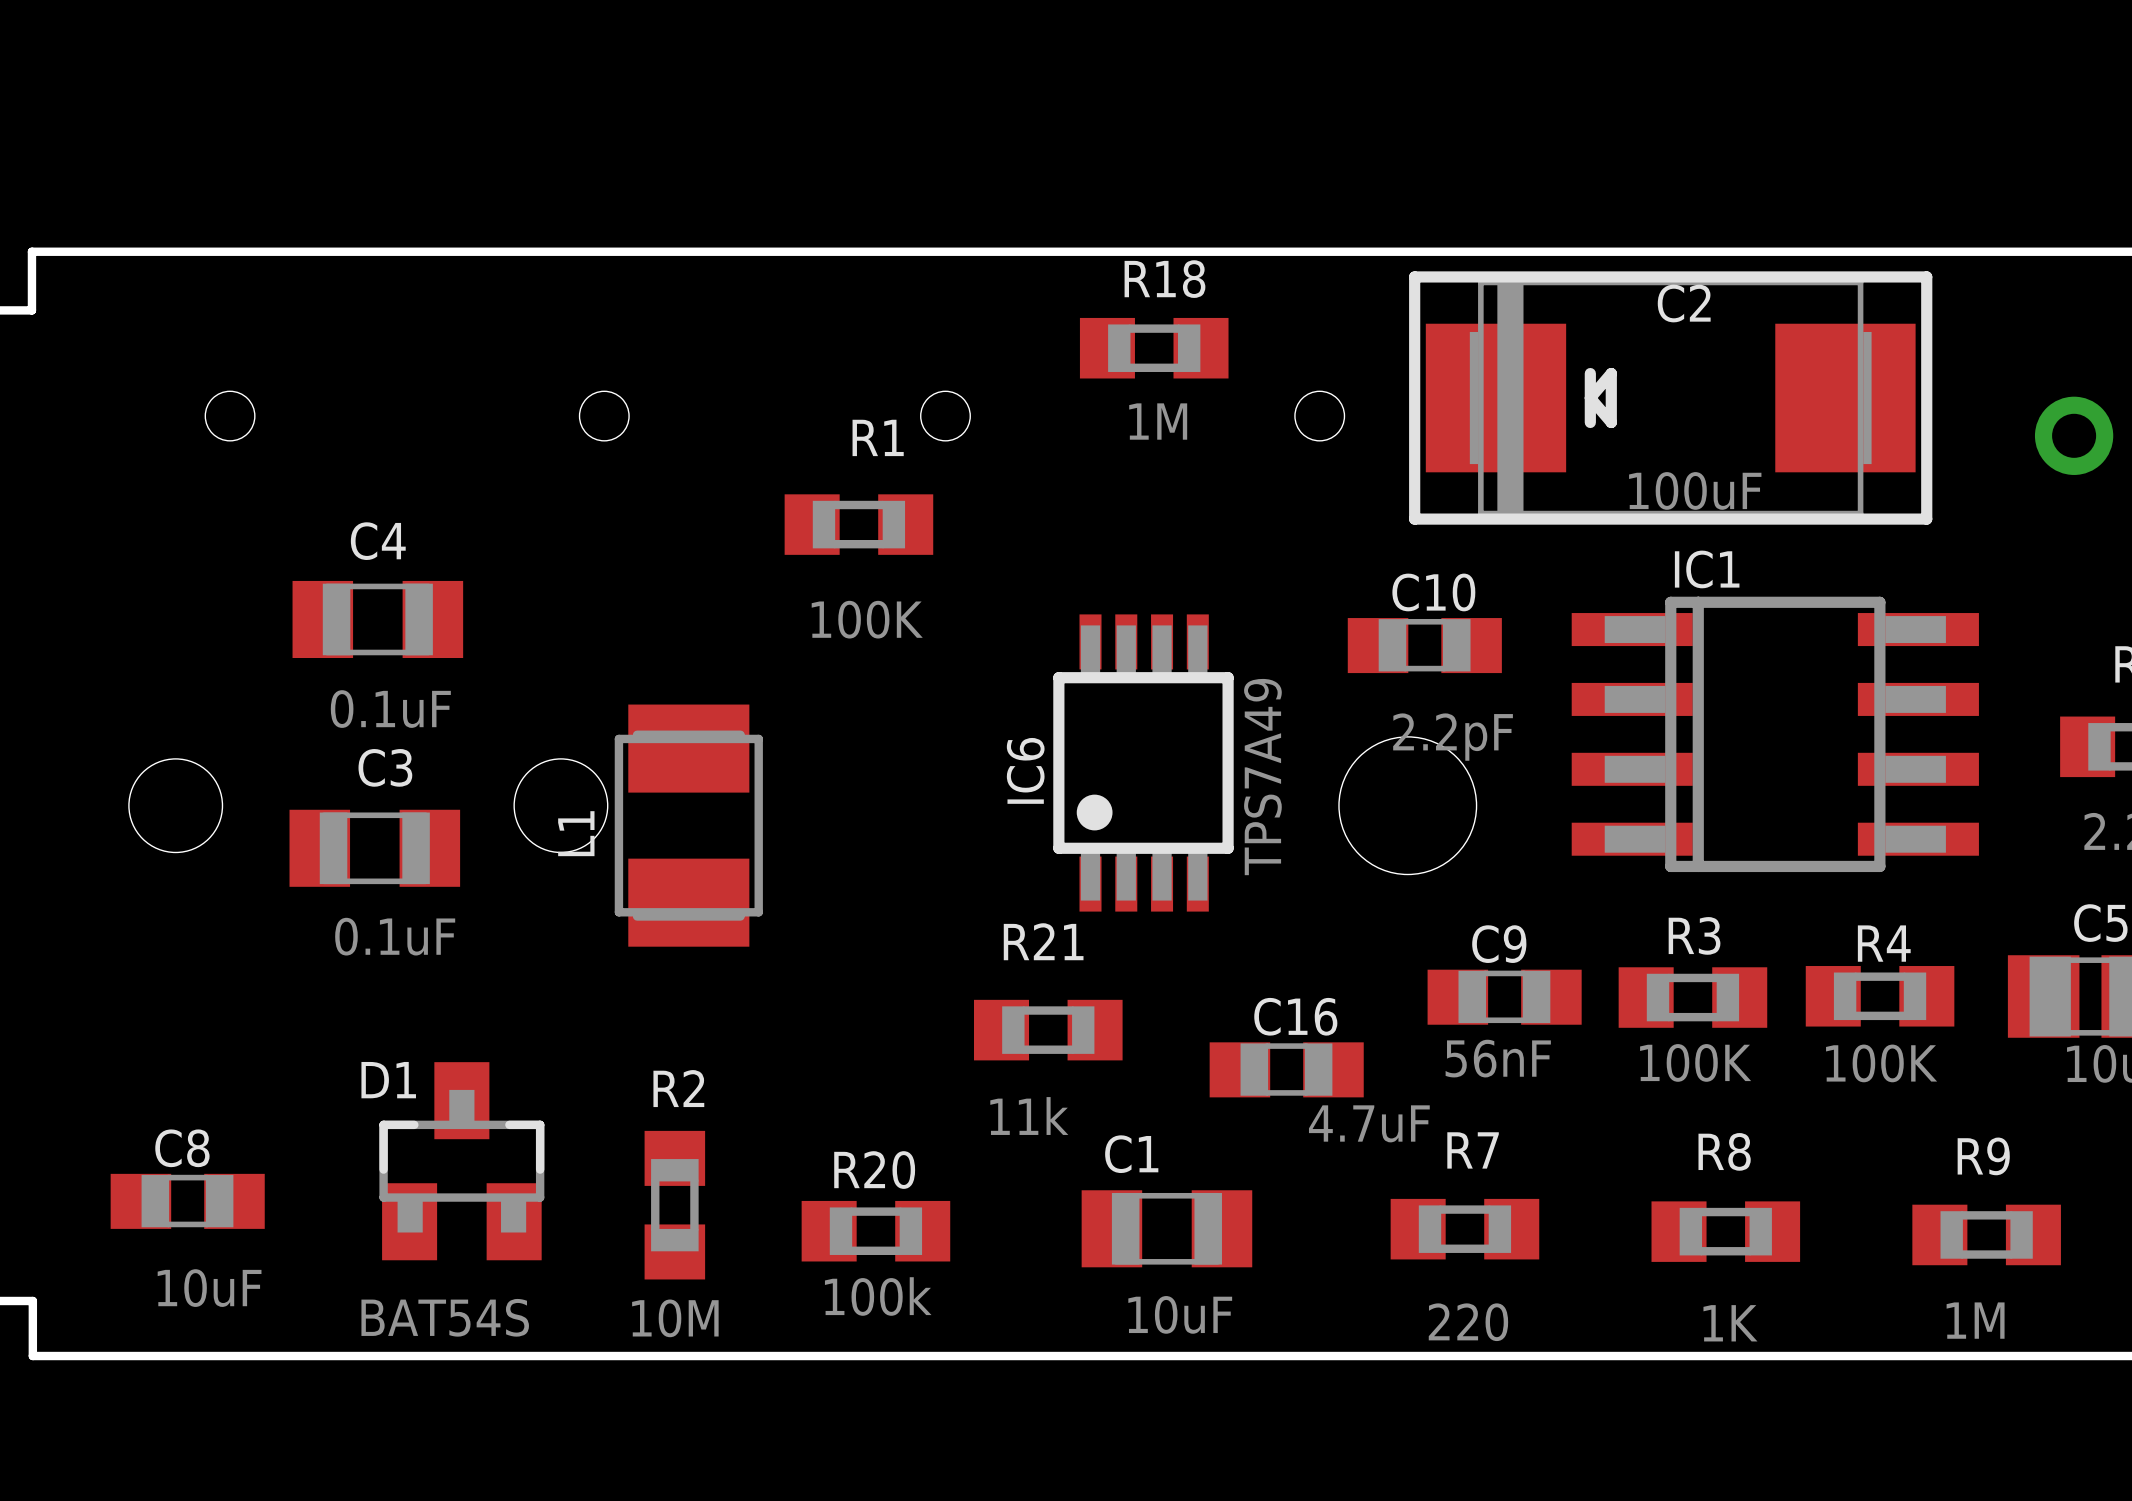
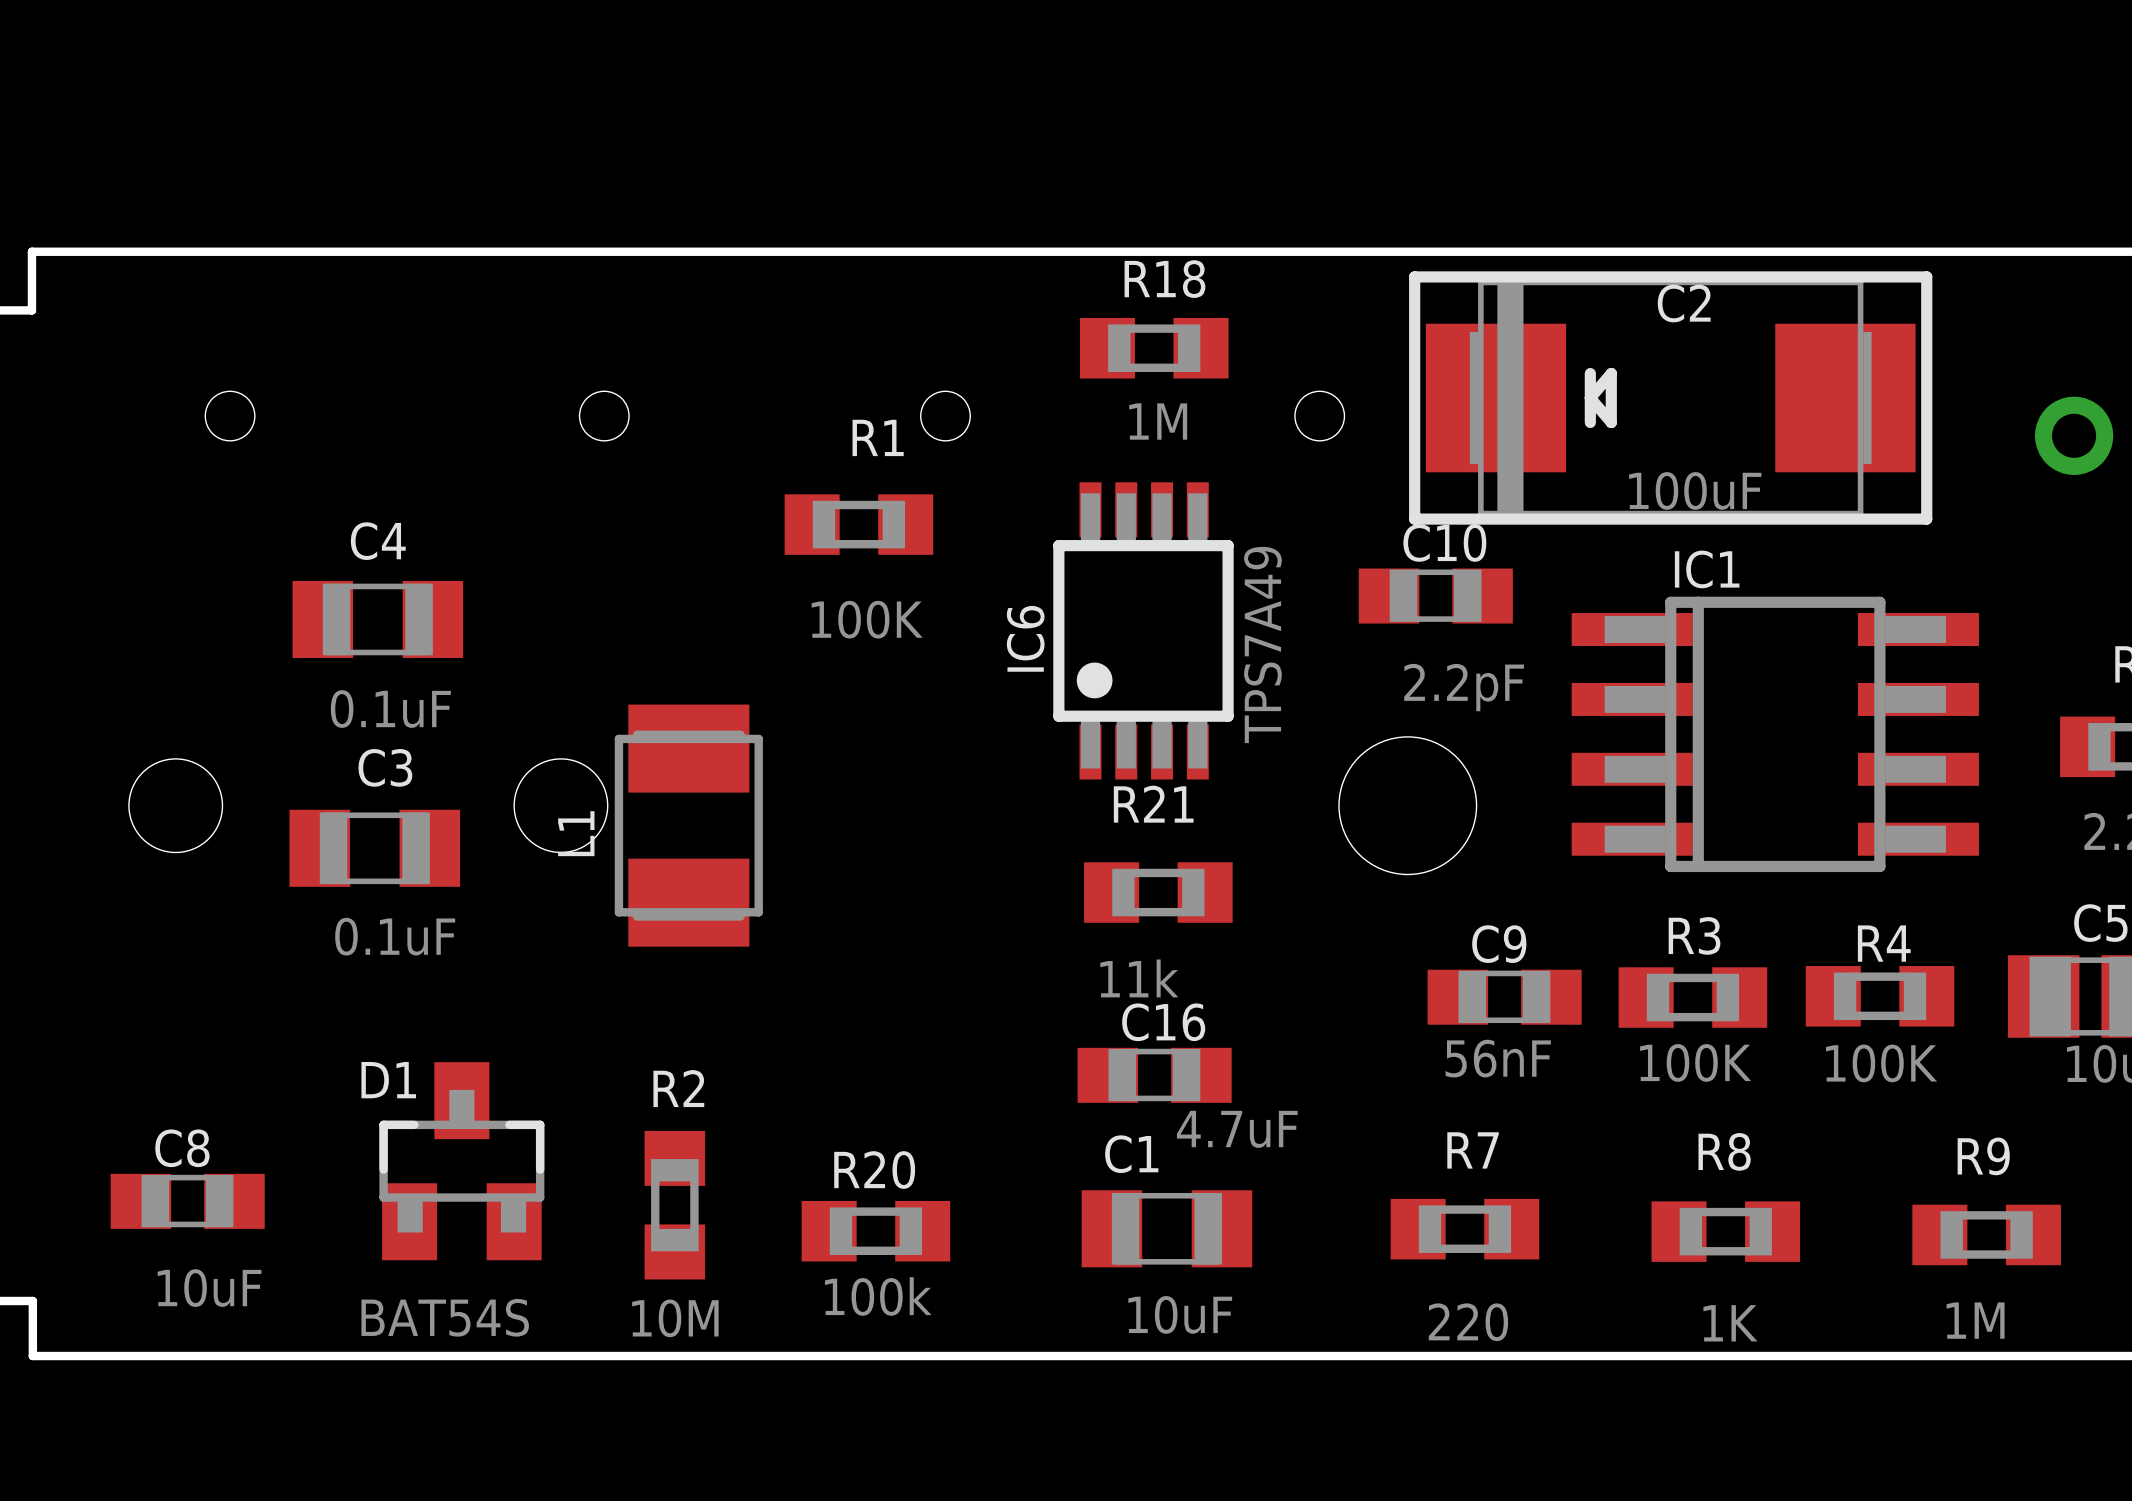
C10 position: (1424, 645) -> (1435, 596)
IC6 position: (1143, 762) -> (1143, 630)
R21 position: (1048, 1030) -> (1158, 892)
C16 position: (1286, 1069) -> (1154, 1075)

